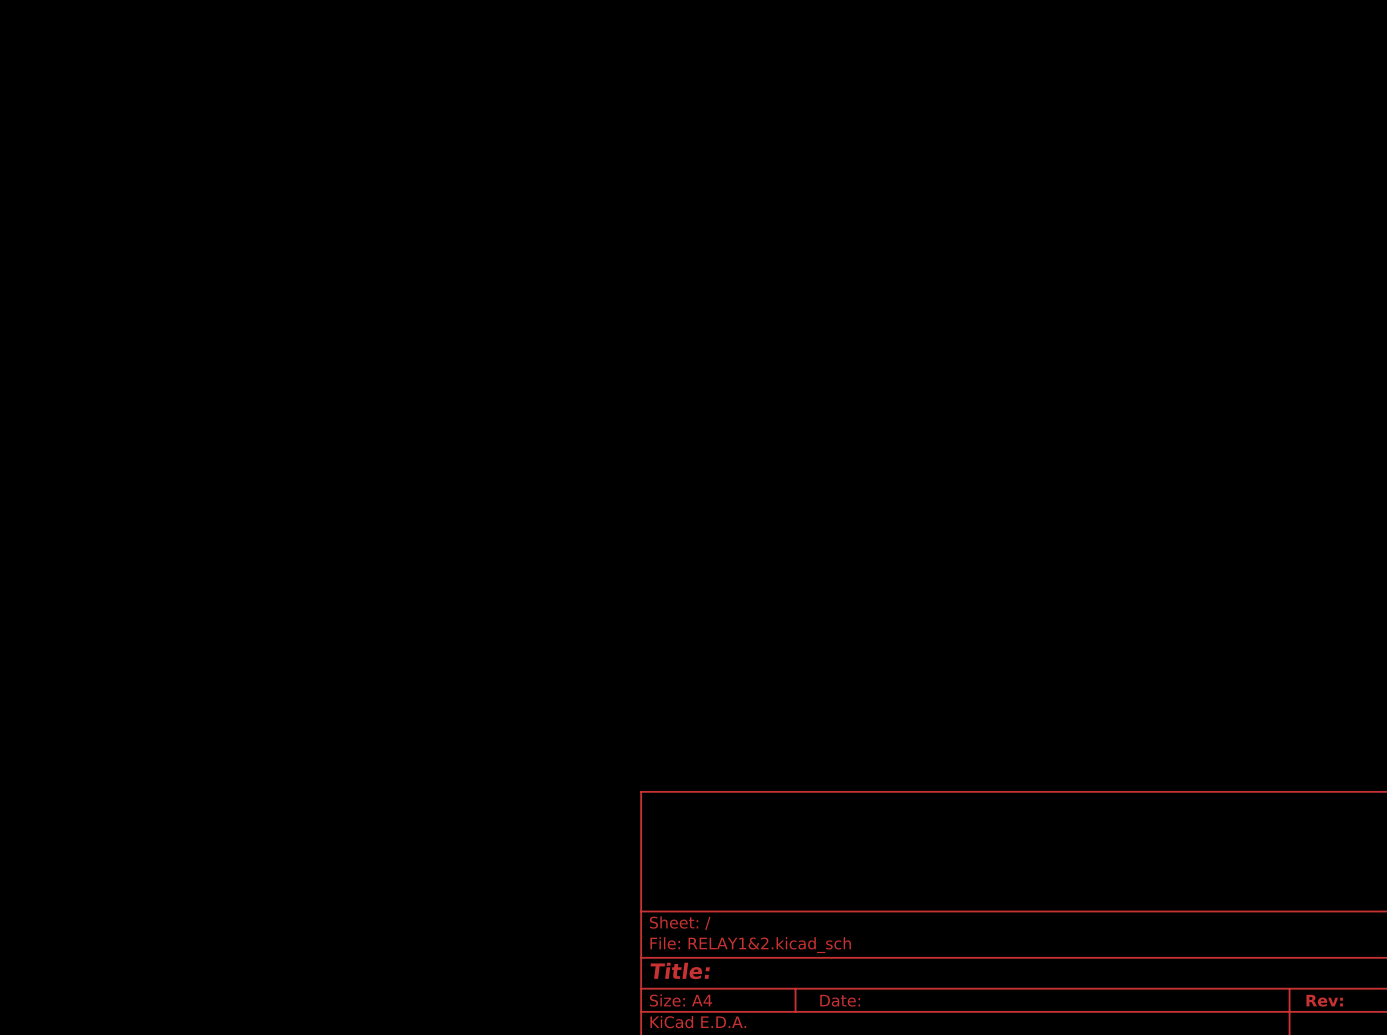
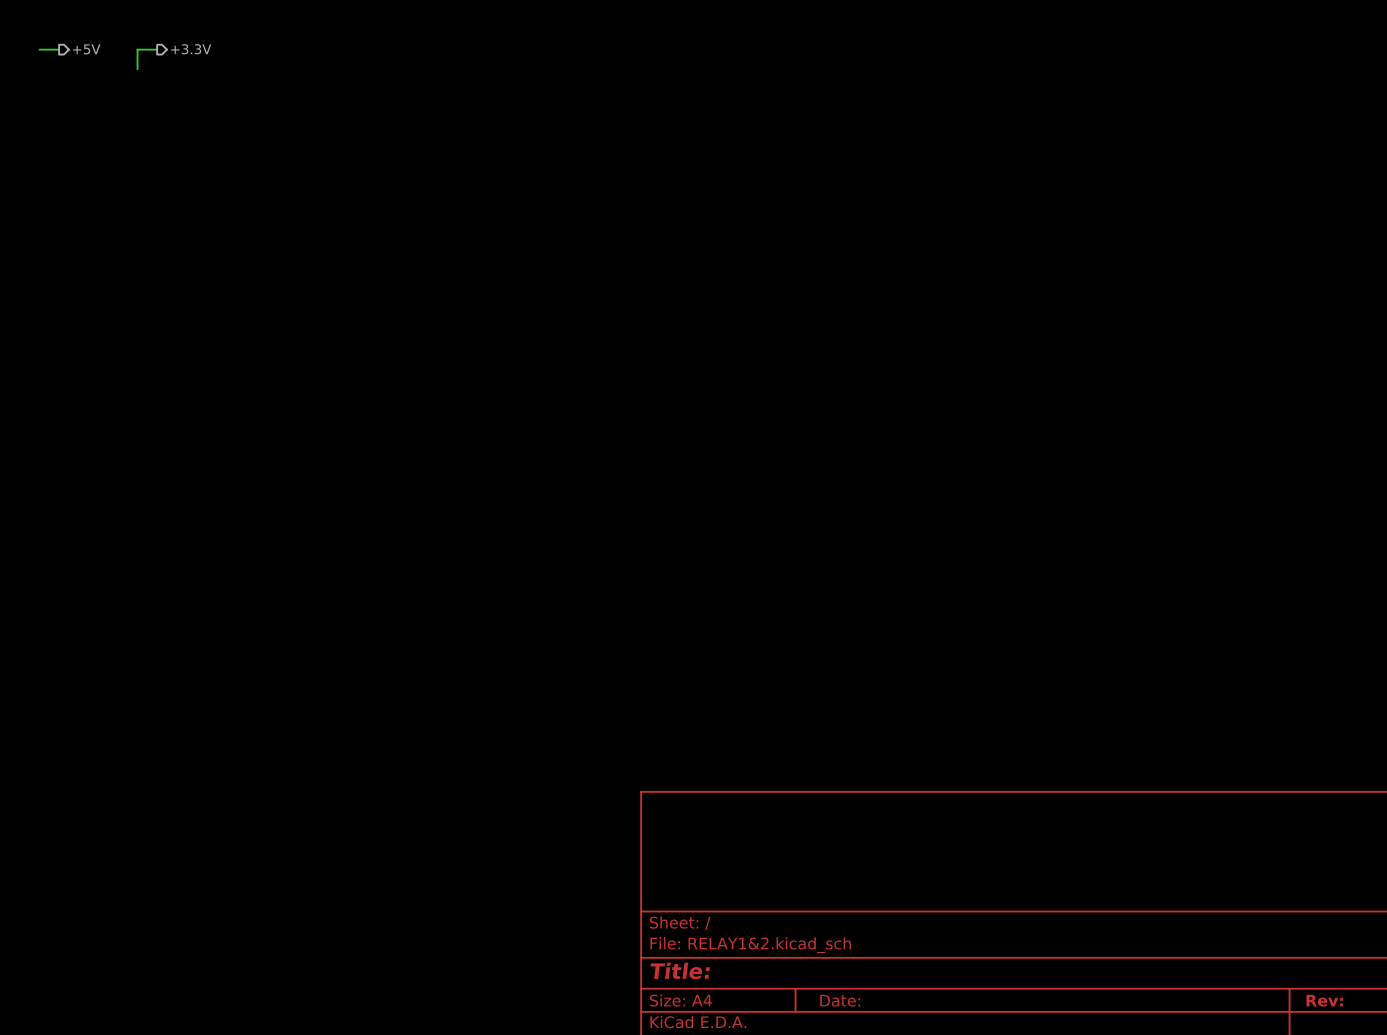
wire: none -> (39, 49) (59, 49)
hierarchical label: none -> +5V (86, 49)
wire: none -> (157, 49) (137, 49) (137, 69)
hierarchical label: none -> +3.3V (191, 49)

